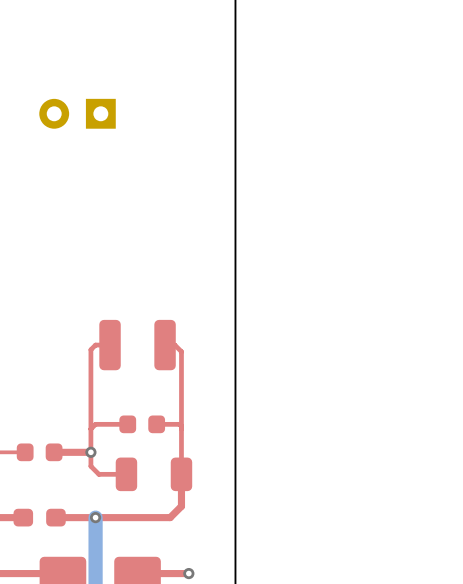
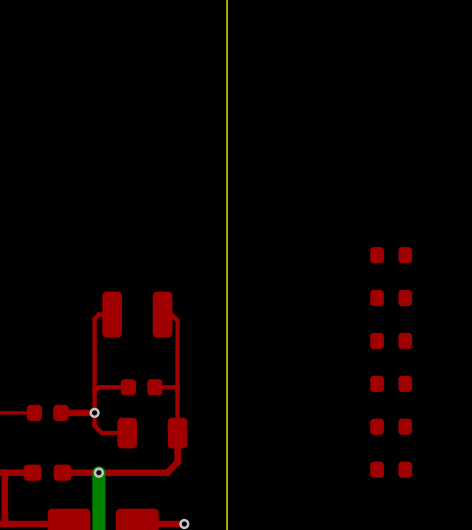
part: (77, 113) -> none
part: none -> (391, 255)
part: none -> (391, 298)
part: none -> (391, 340)
part: none -> (391, 383)
part: none -> (391, 426)
part: none -> (391, 469)

